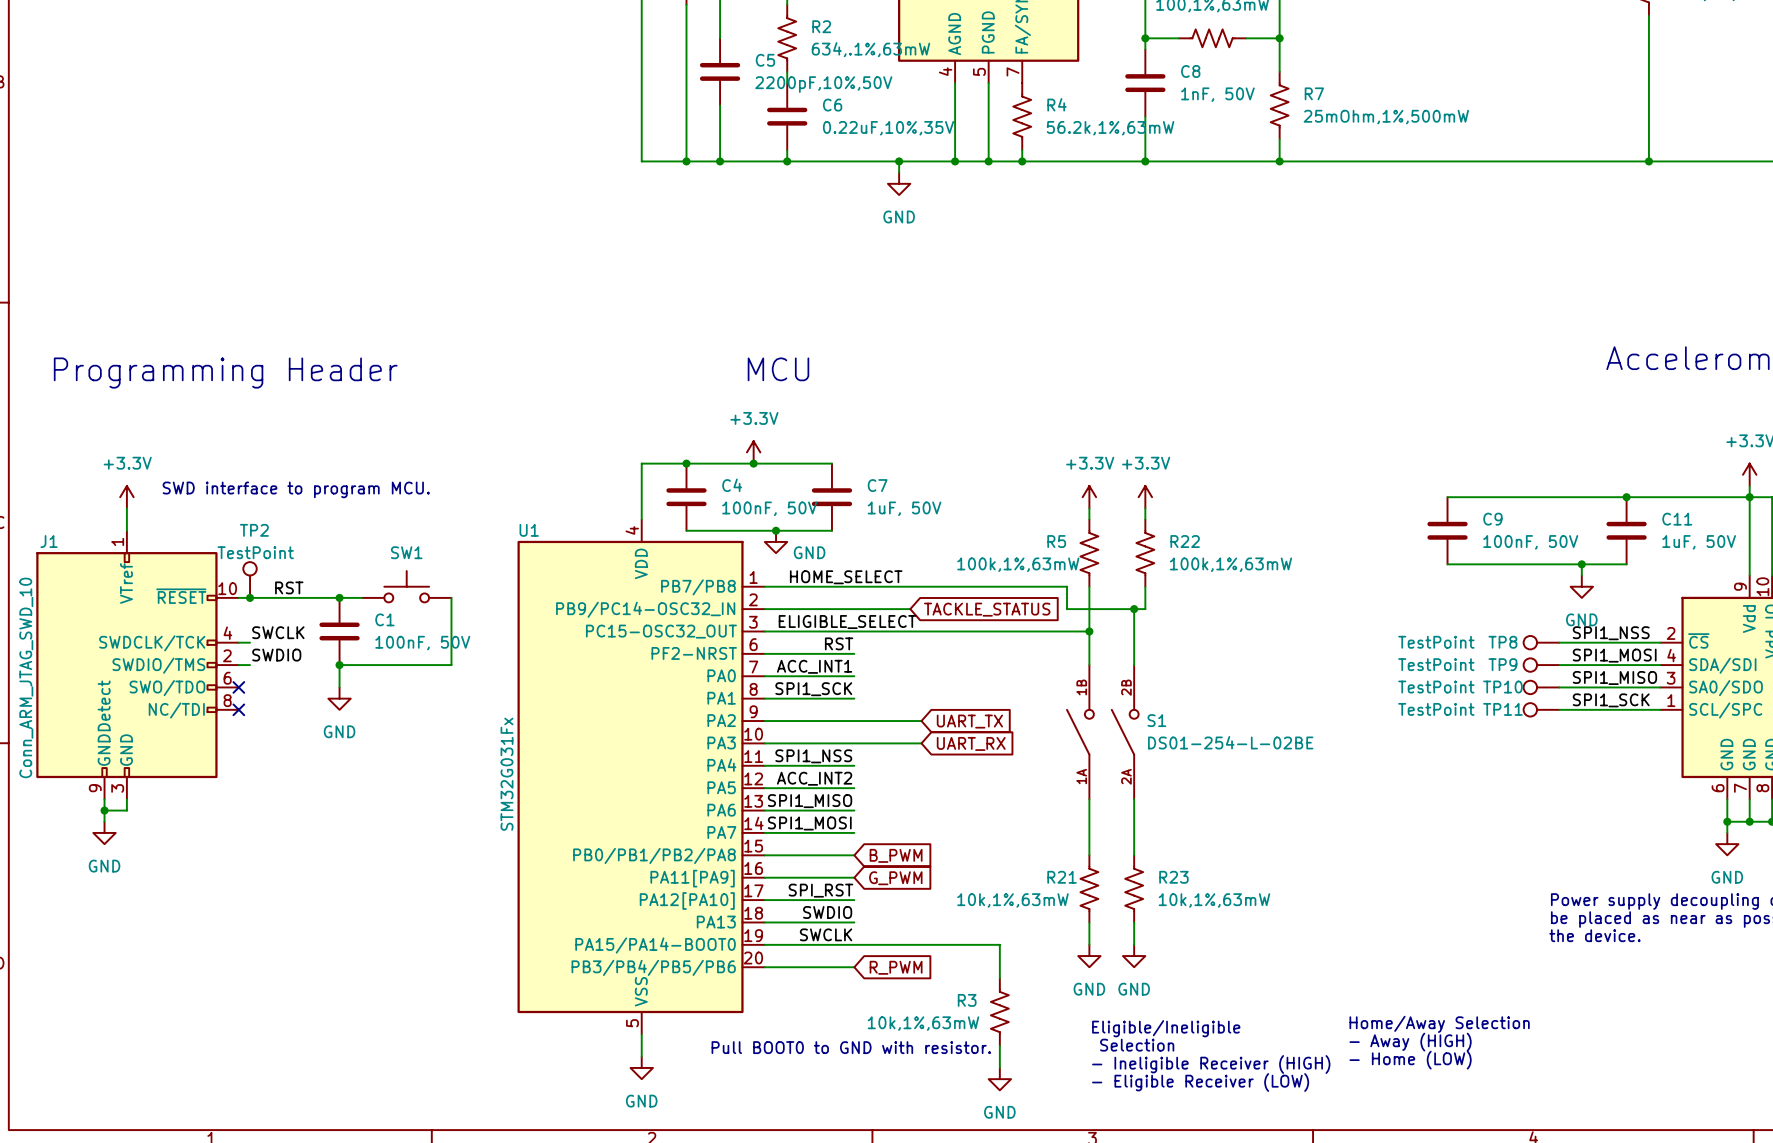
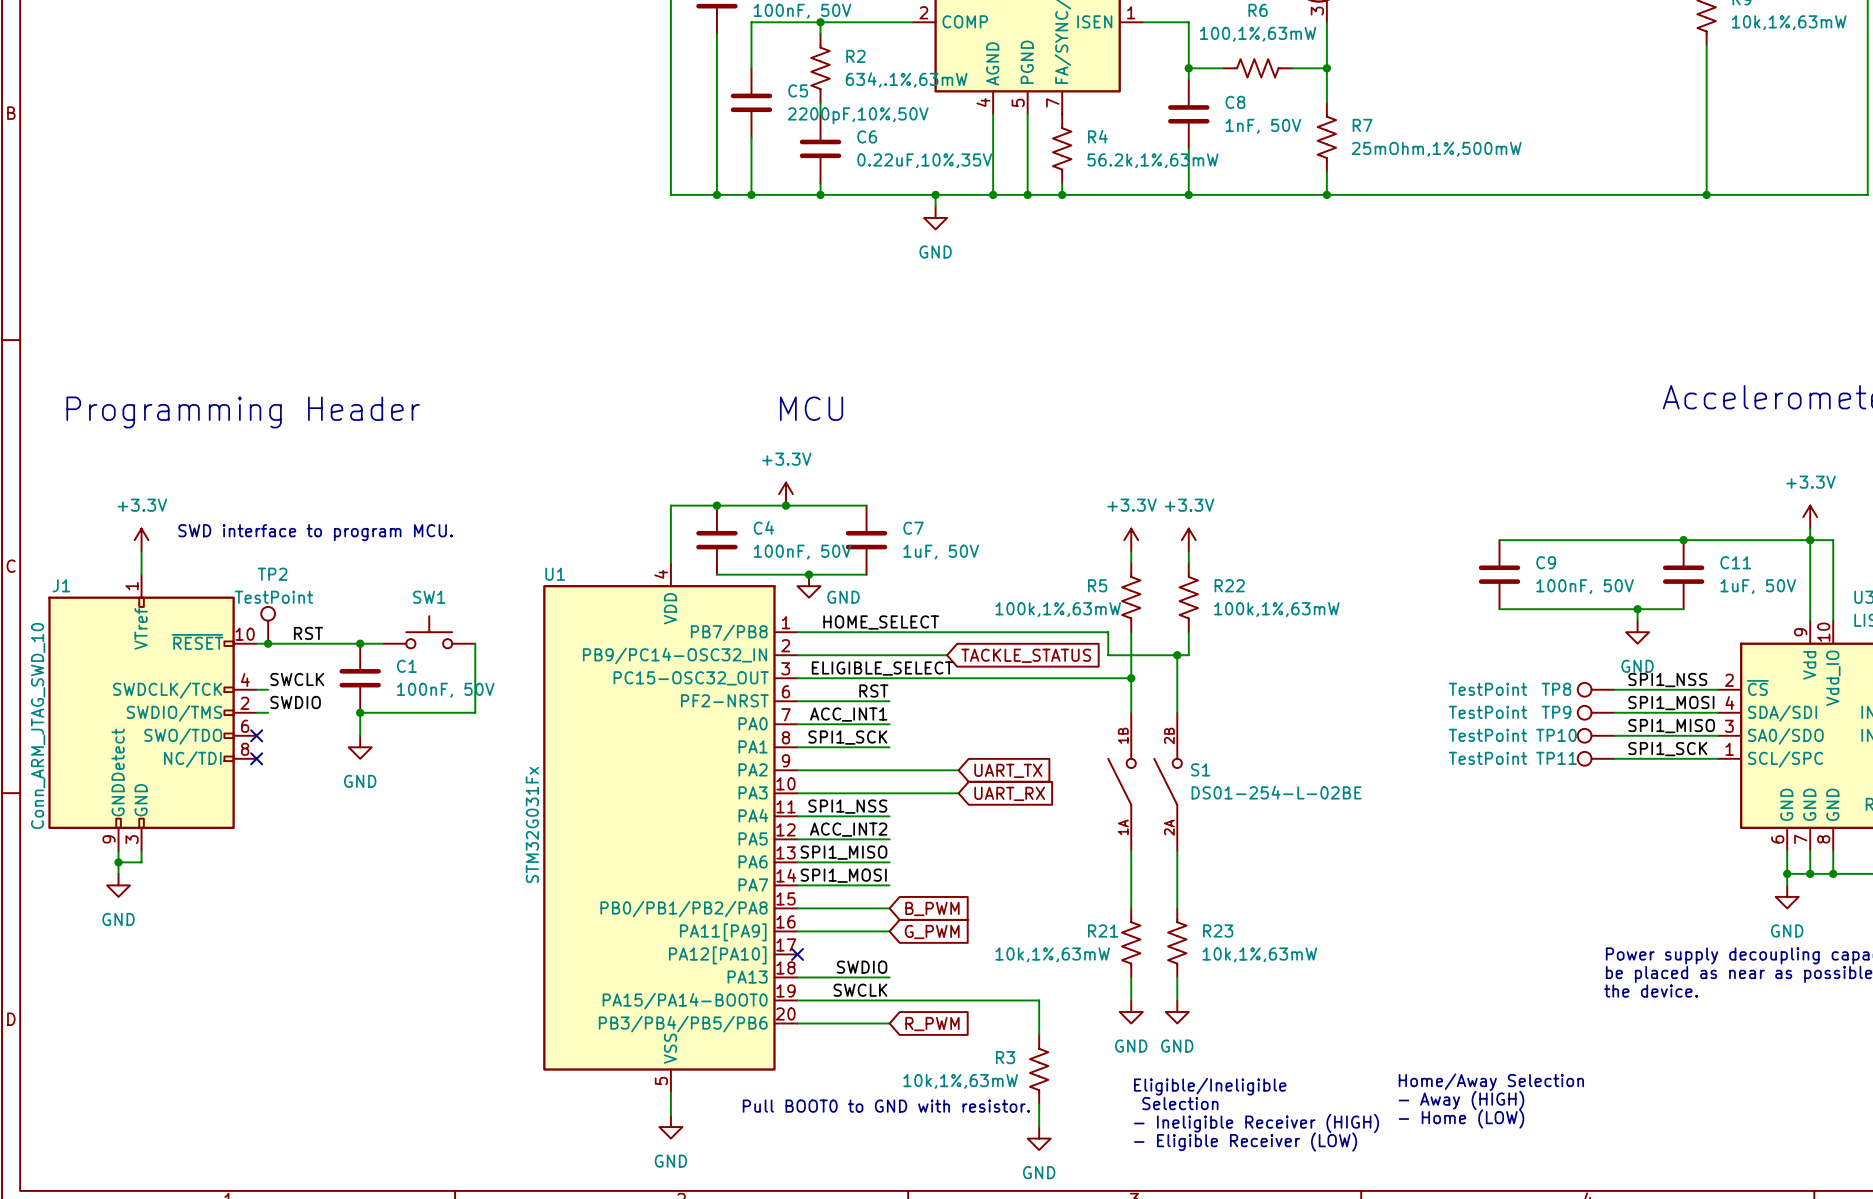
label: SPI_RST (820, 890) -> none
wire: (764, 900) (854, 900) -> none
no-connect mark: none -> (797, 954)

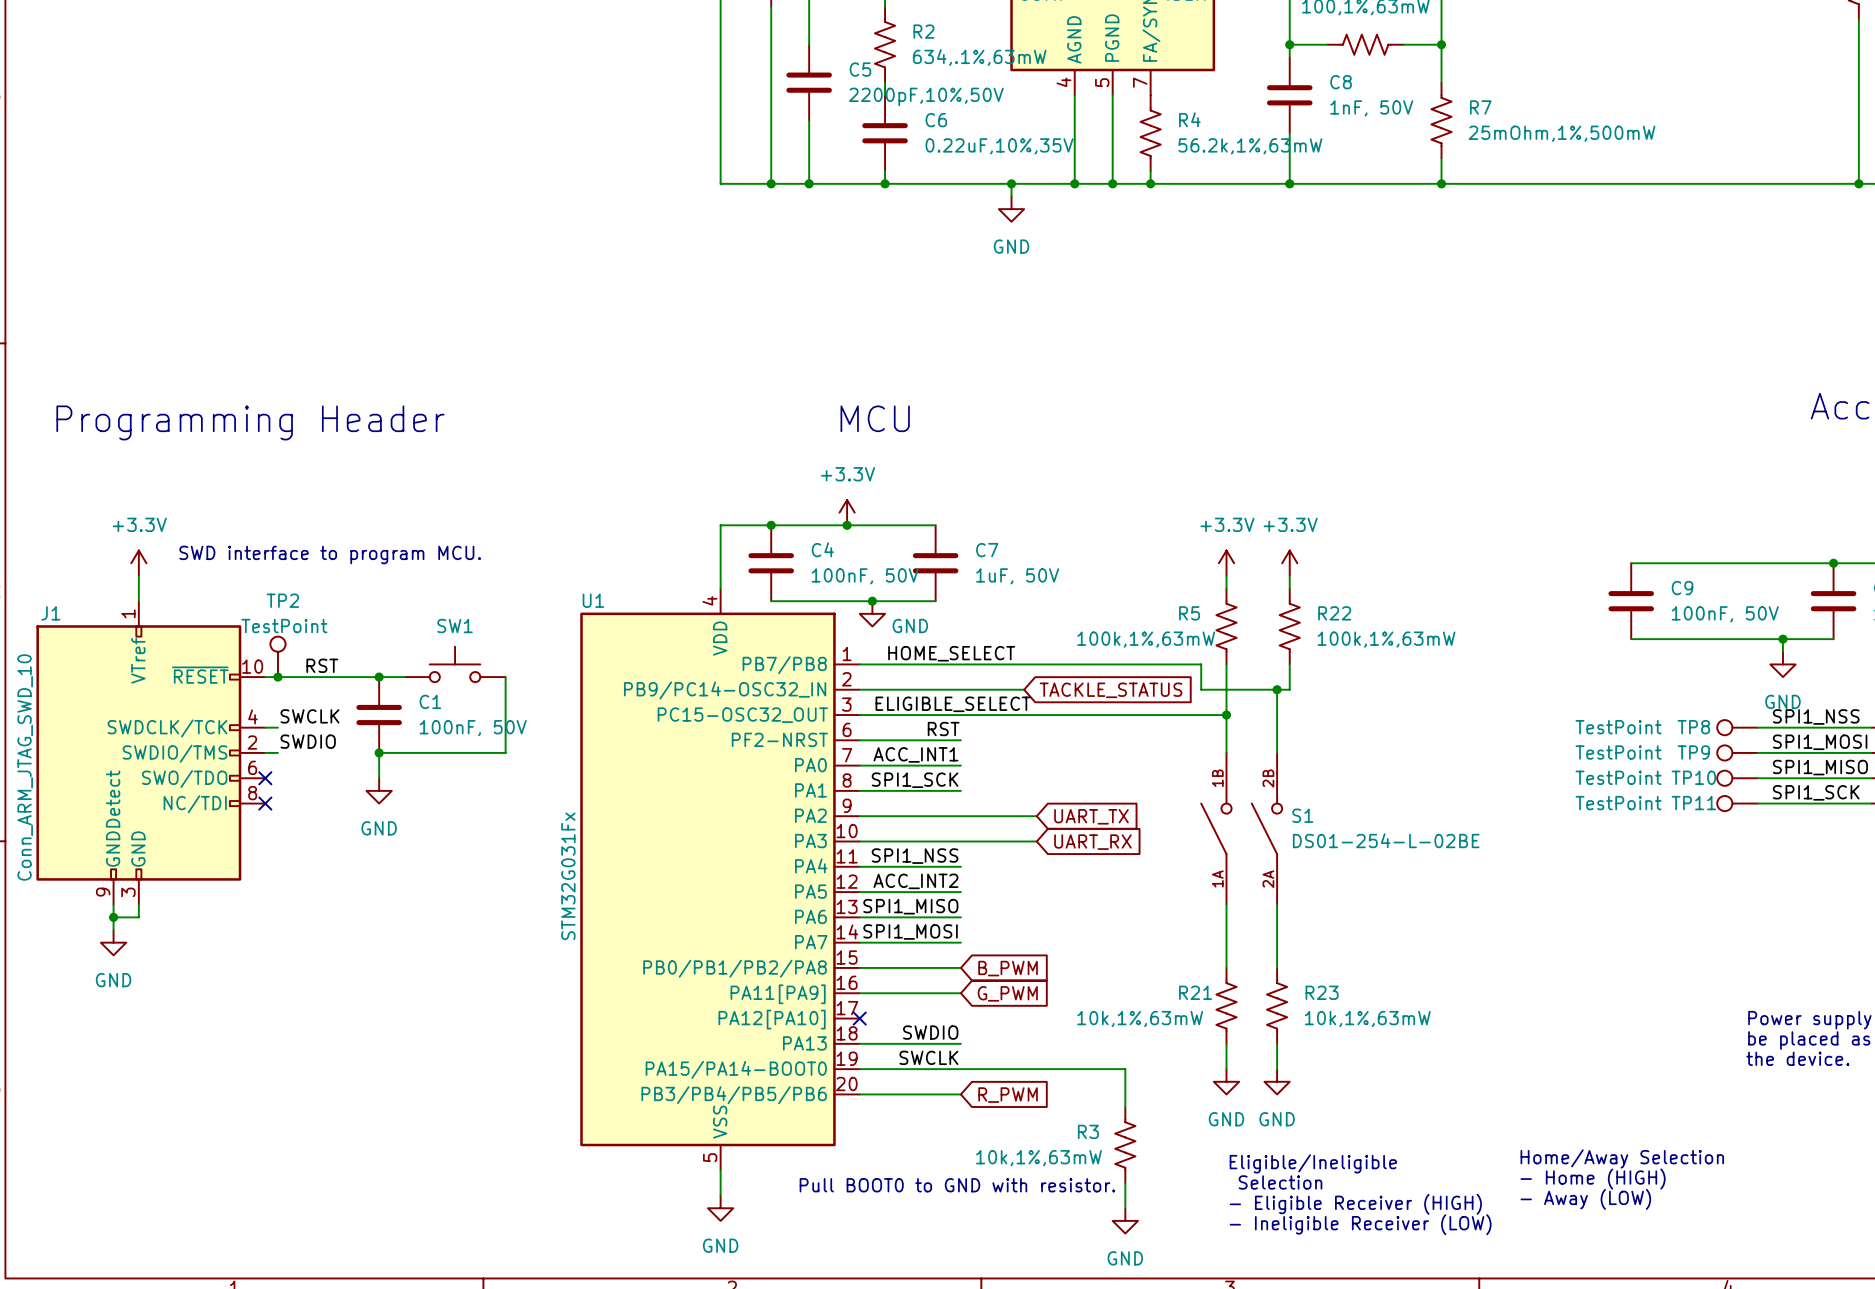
text: - Away (HIGH) (1461, 1100) -> - Home (HIGH) (1593, 1179)
text: - Home (LOW) (1461, 1119) -> - Away (LOW) (1585, 1199)
text: - Ineligible Receiver (HIGH) (1256, 1123) -> - Eligible Receiver (HIGH) (1355, 1204)
text: - Eligible Receiver (LOW) (1245, 1142) -> - Ineligible Receiver (LOW) (1360, 1224)

